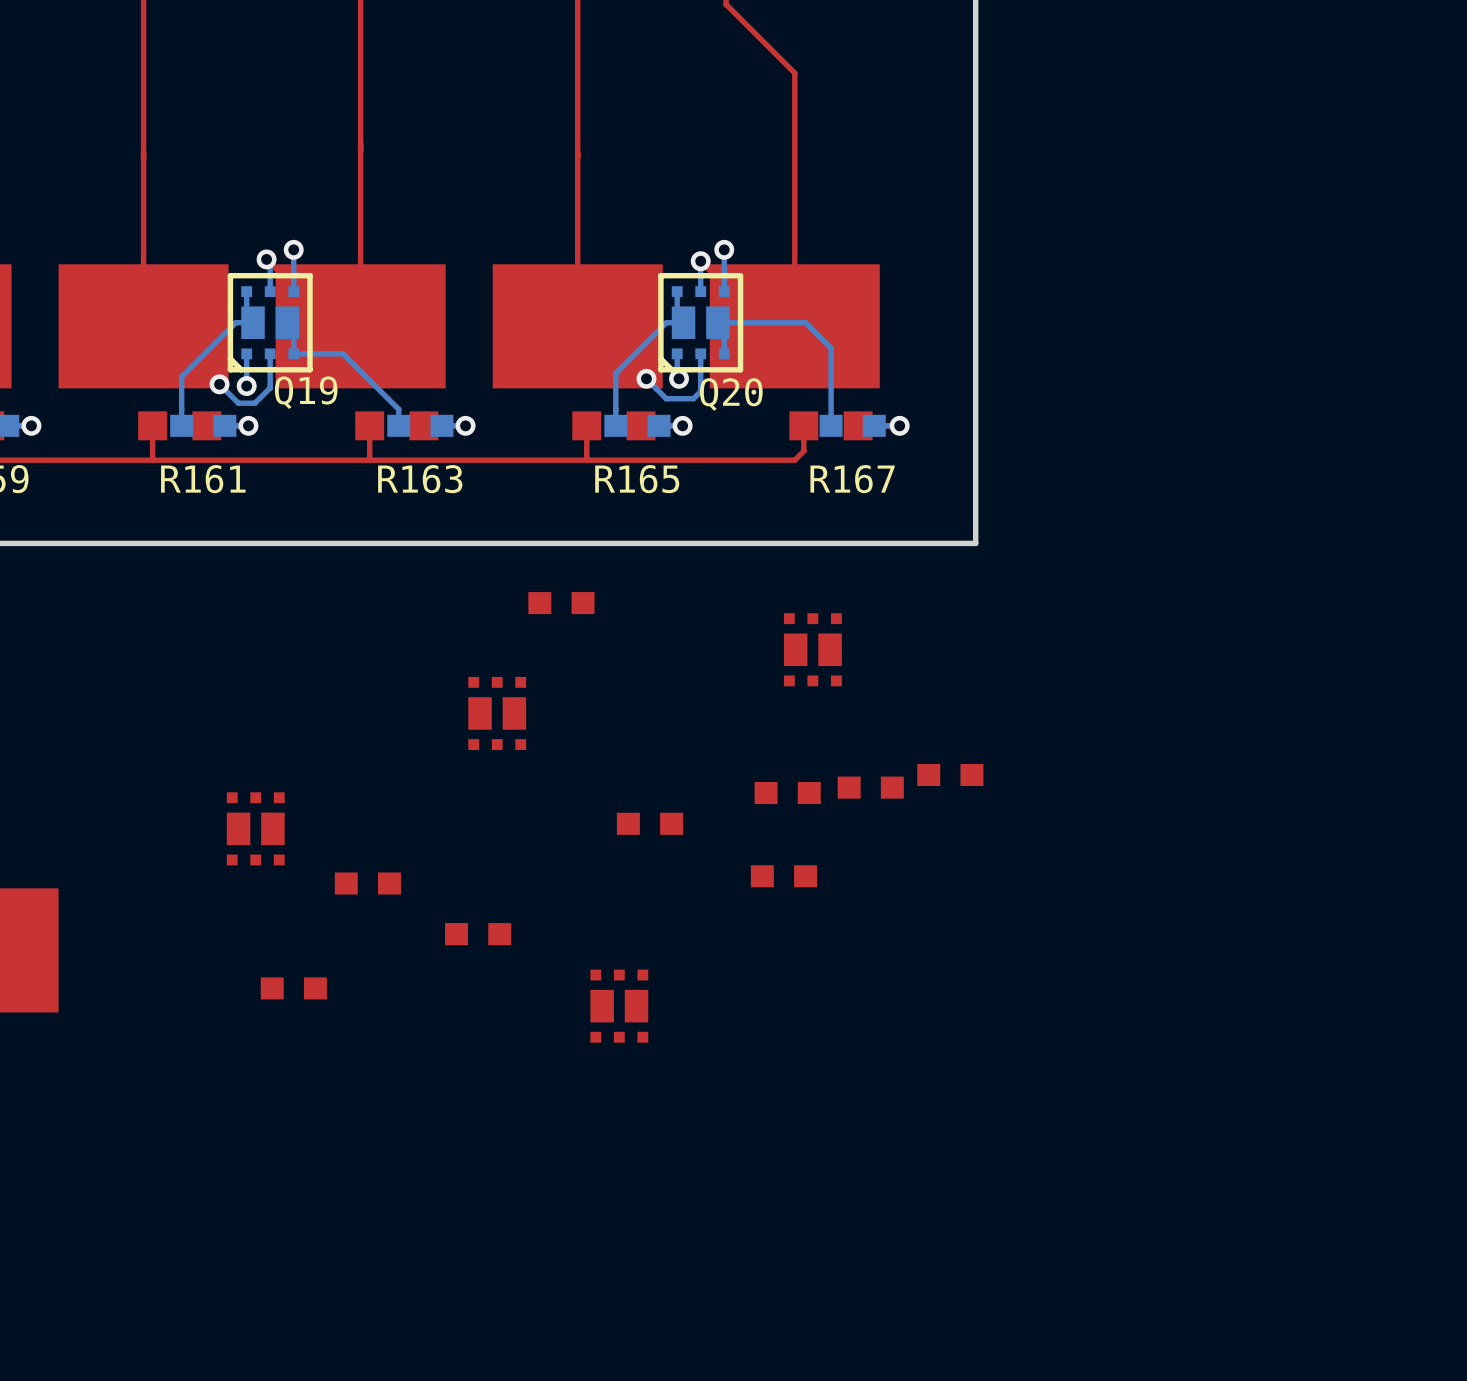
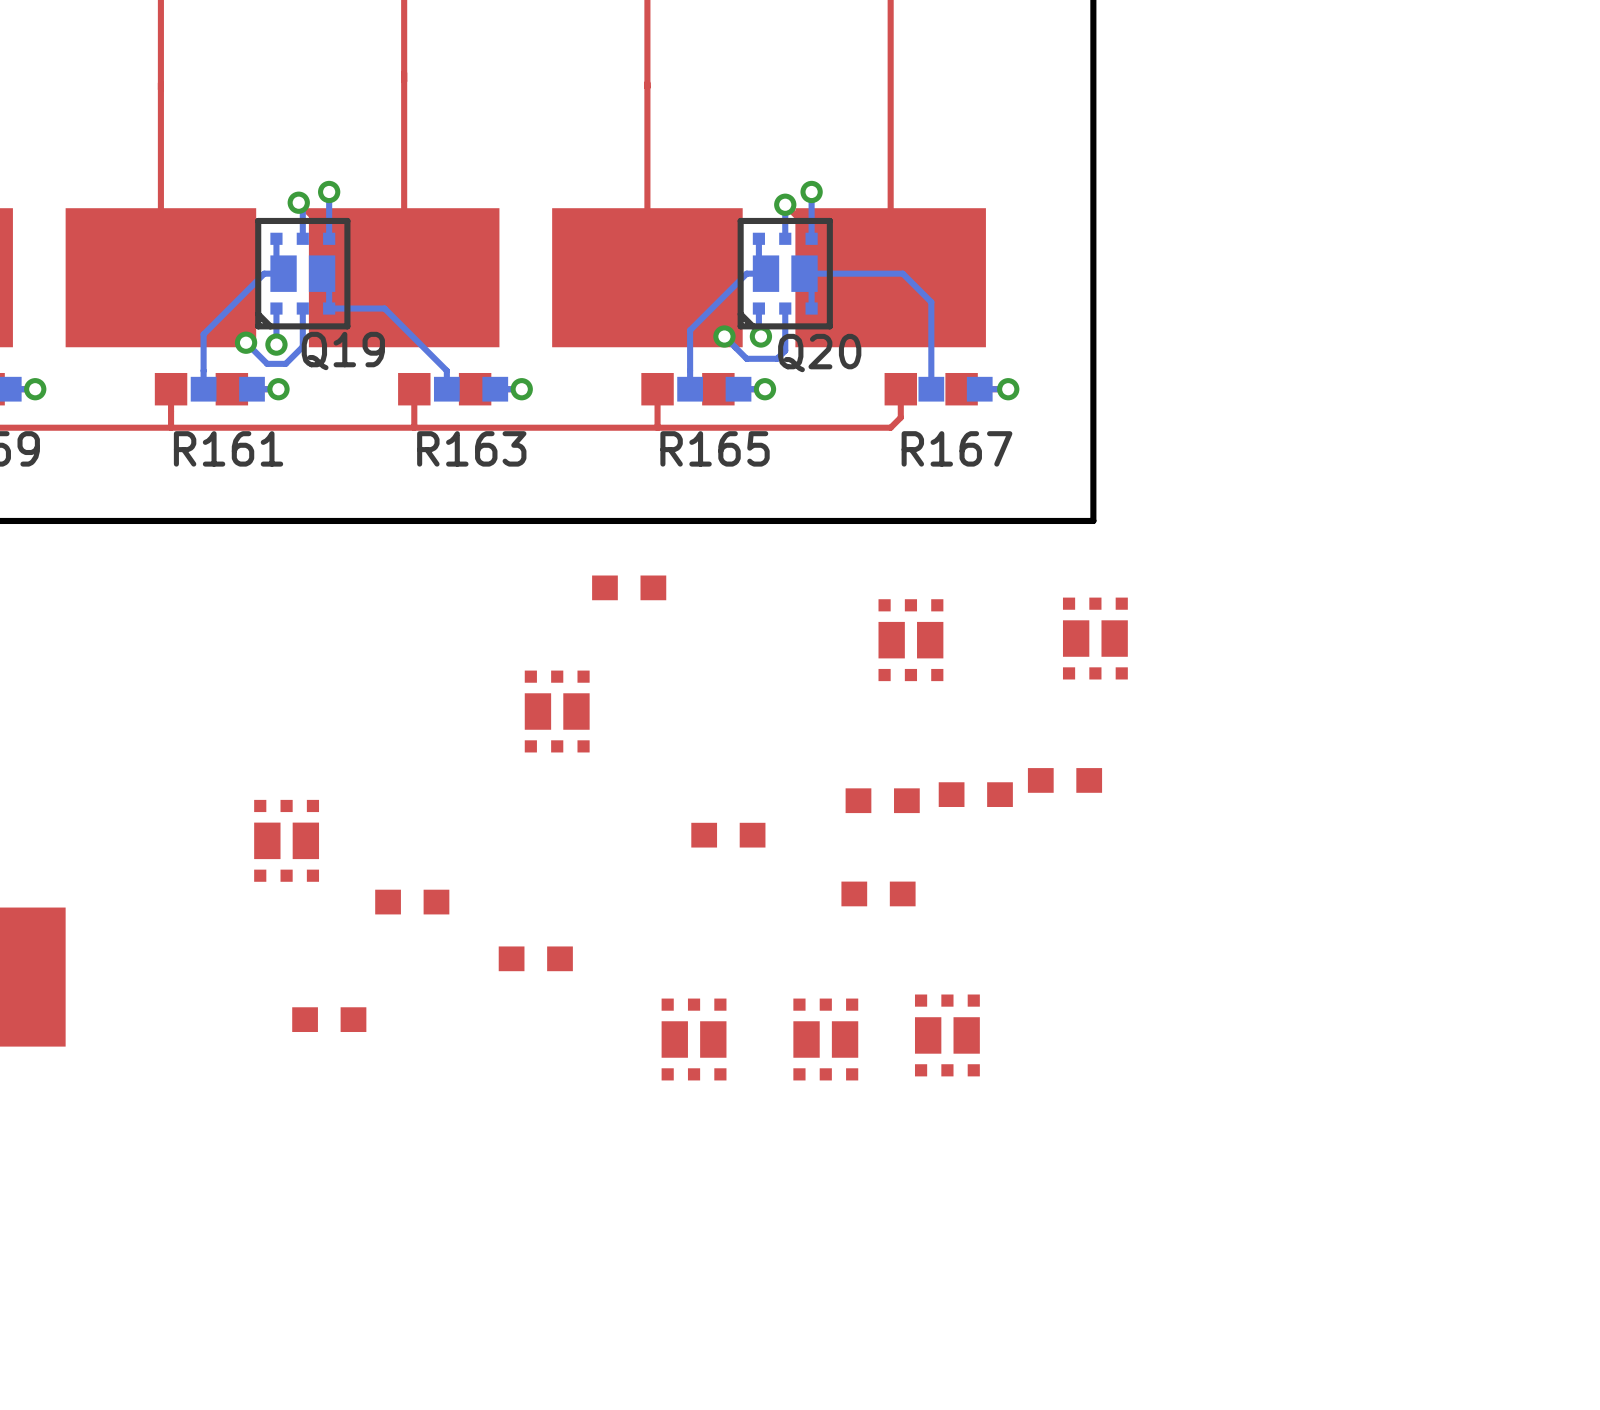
part: none -> (1095, 638)
part: none -> (947, 1035)
part: none -> (825, 1039)

